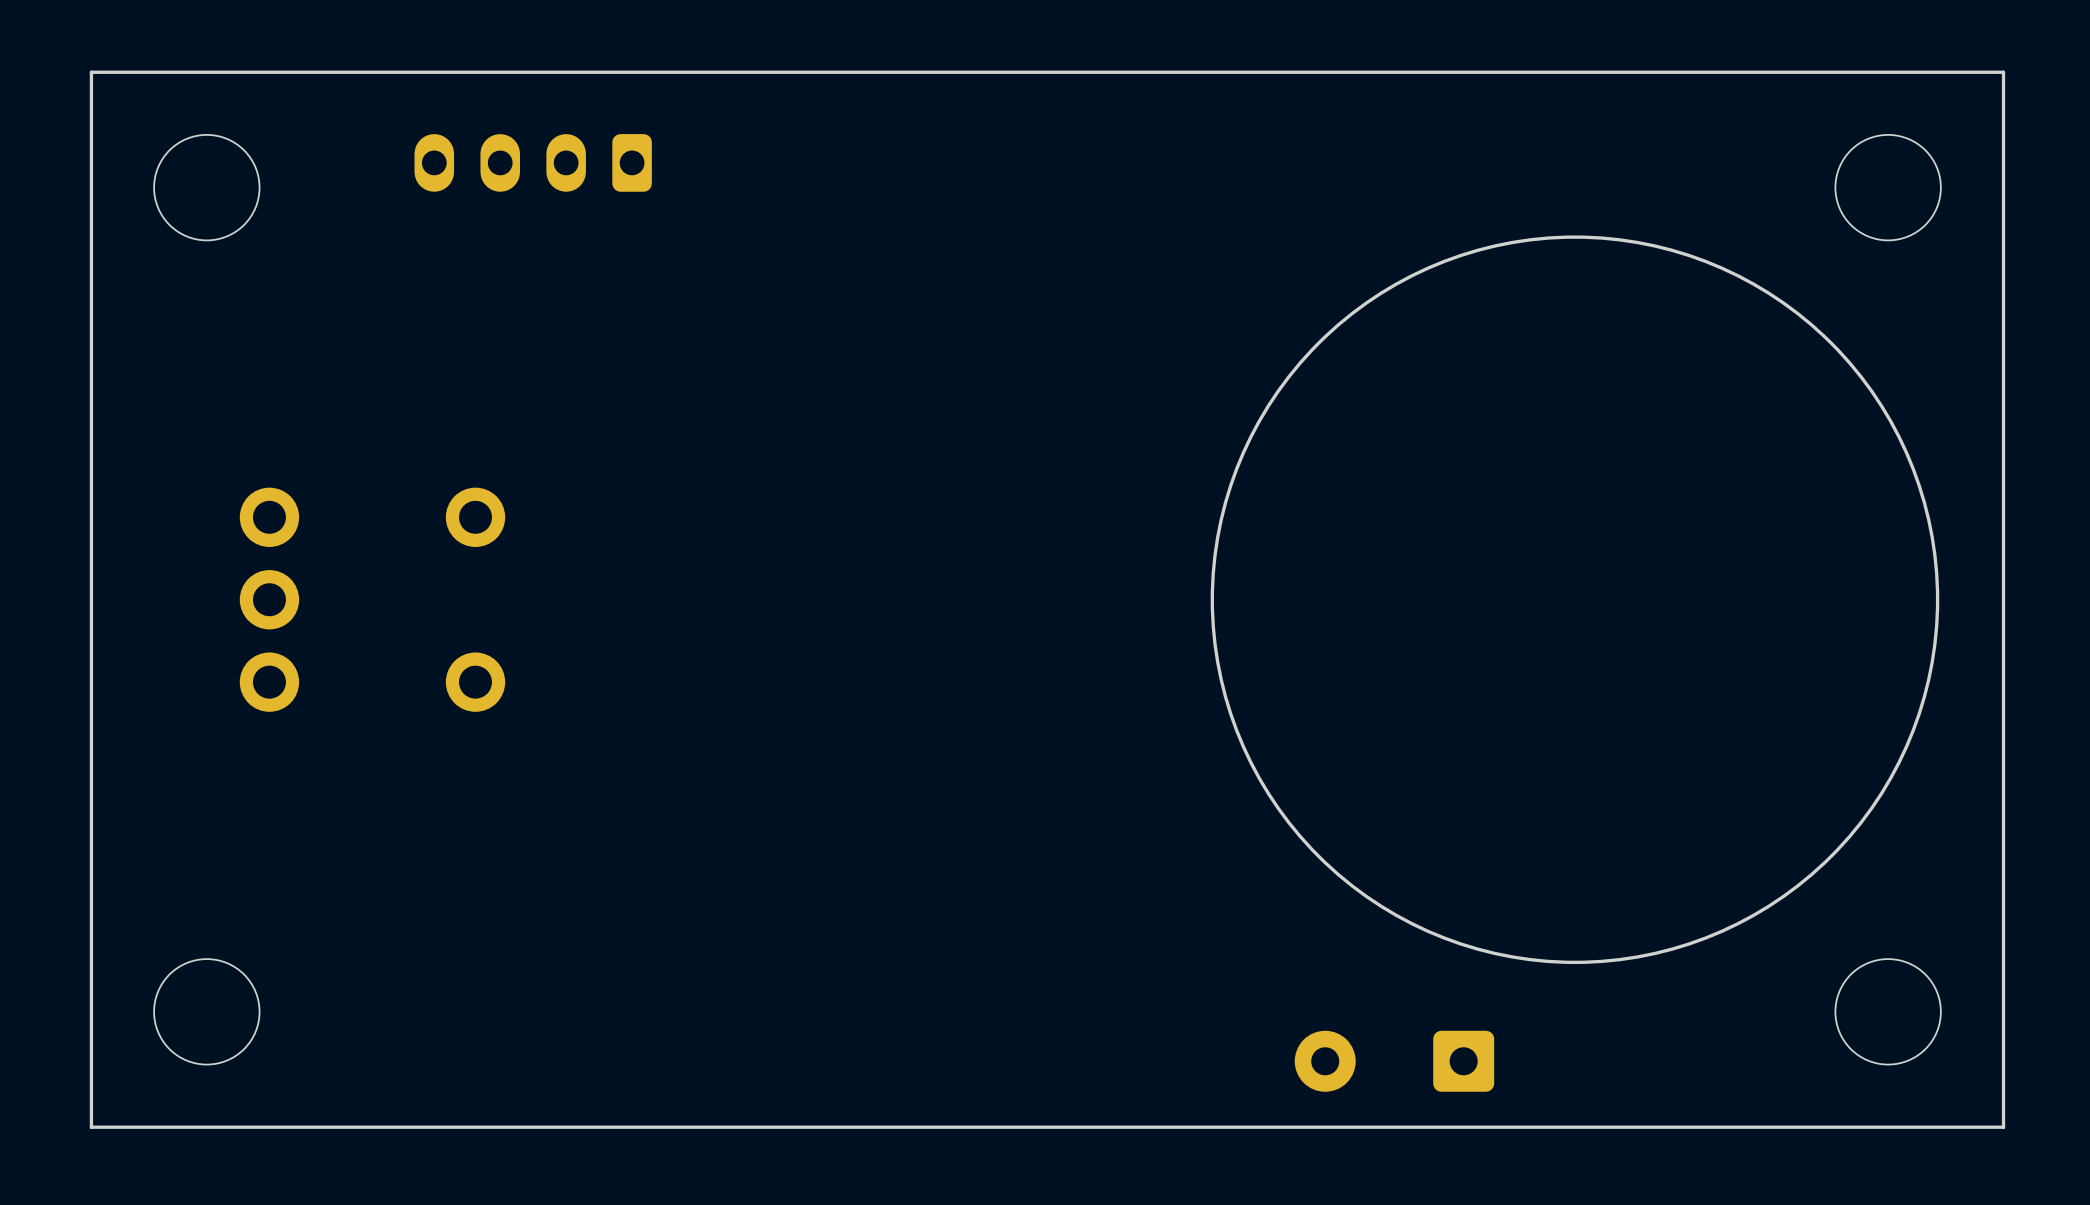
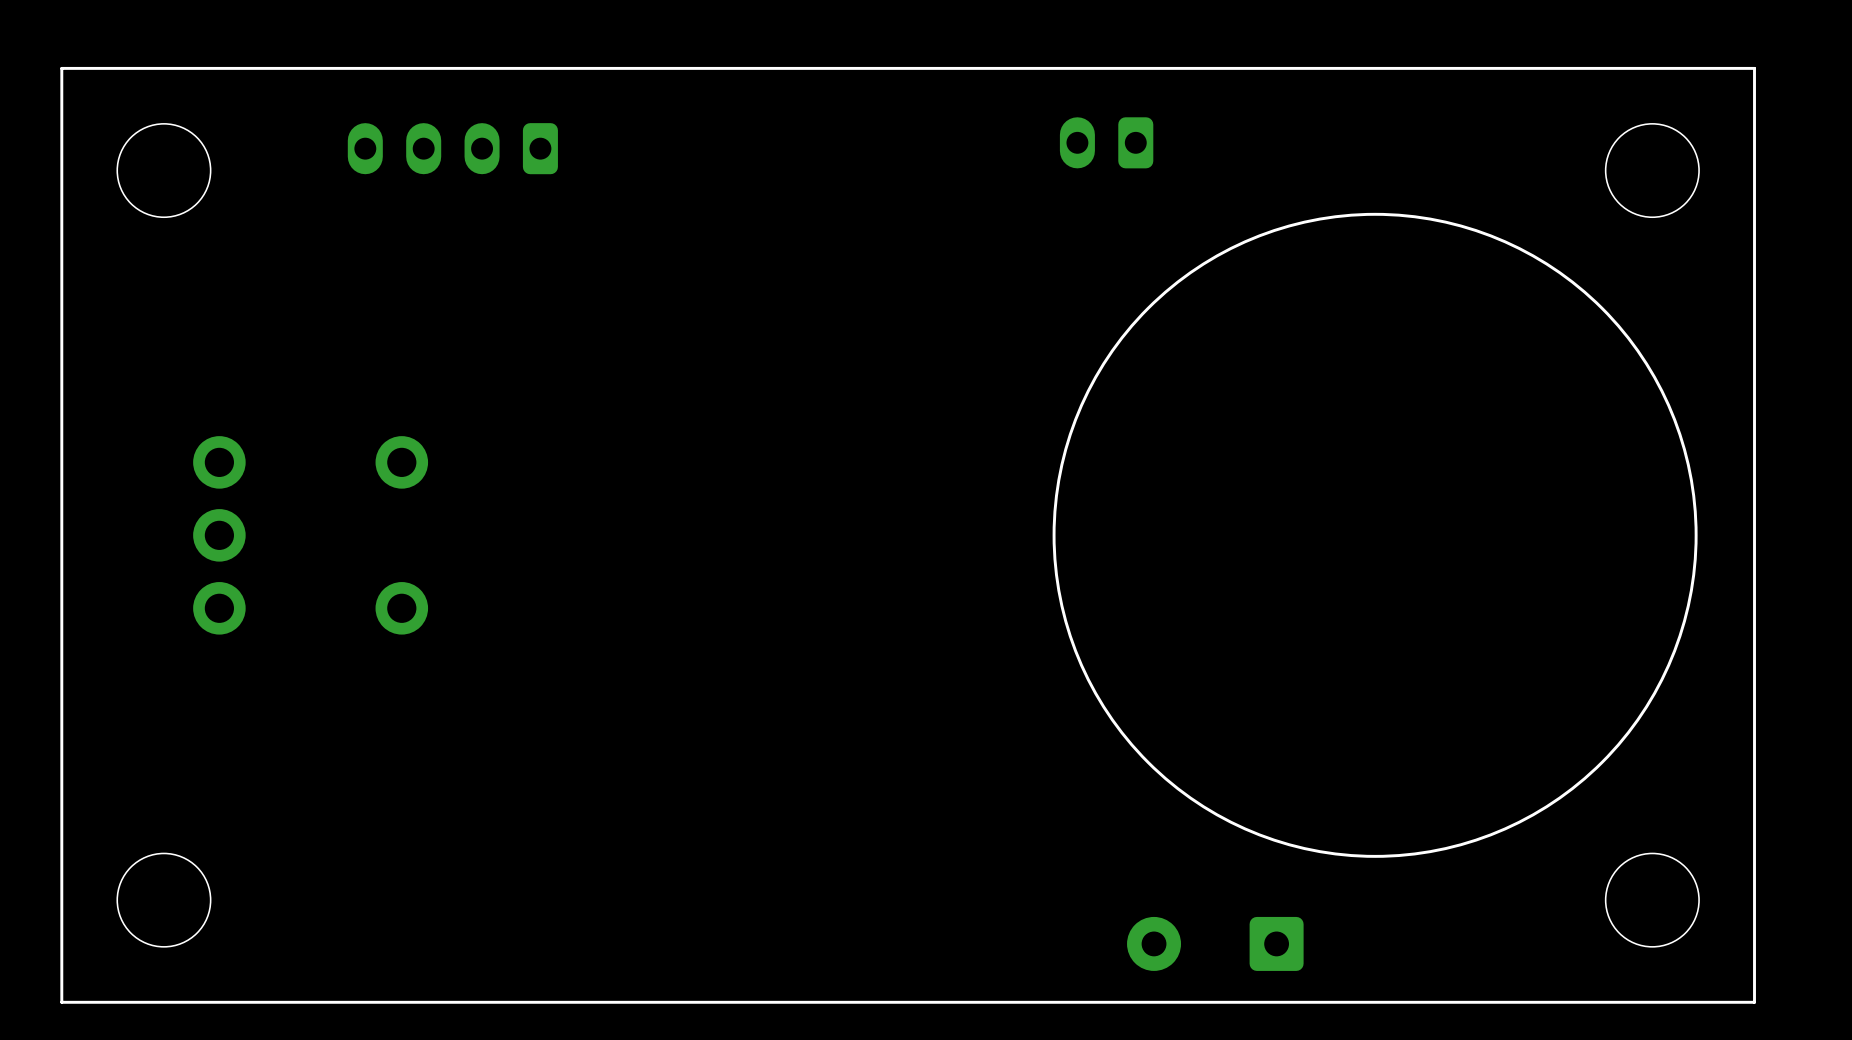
part: none -> (1106, 142)

